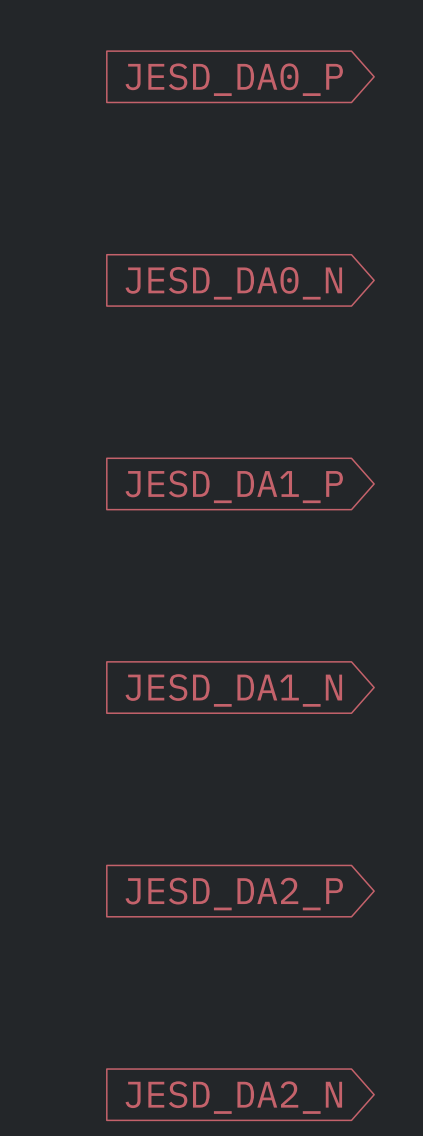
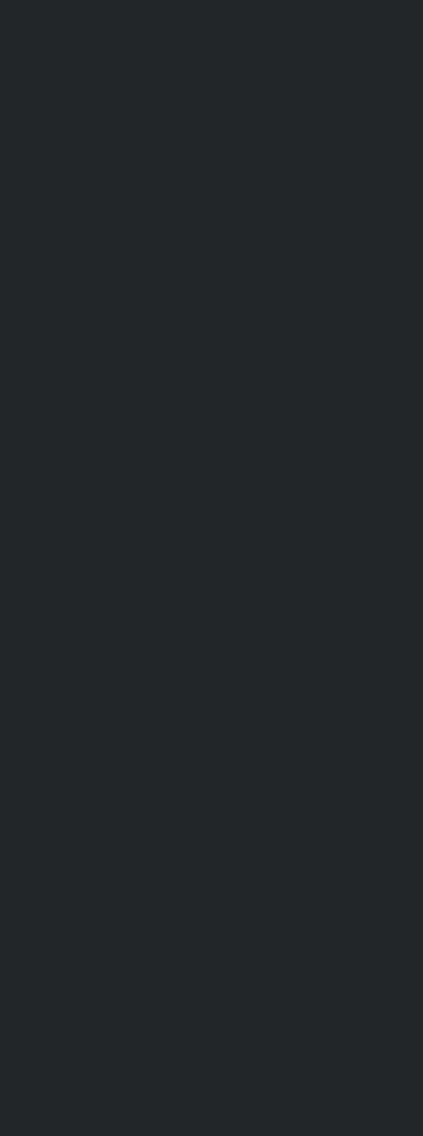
global label: JESD_DA0_P (234, 79) -> none
global label: JESD_DA0_N (233, 283) -> none
global label: JESD_DA1_P (234, 486) -> none
global label: JESD_DA1_N (233, 690) -> none
global label: JESD_DA2_P (234, 894) -> none
global label: JESD_DA2_N (233, 1097) -> none

